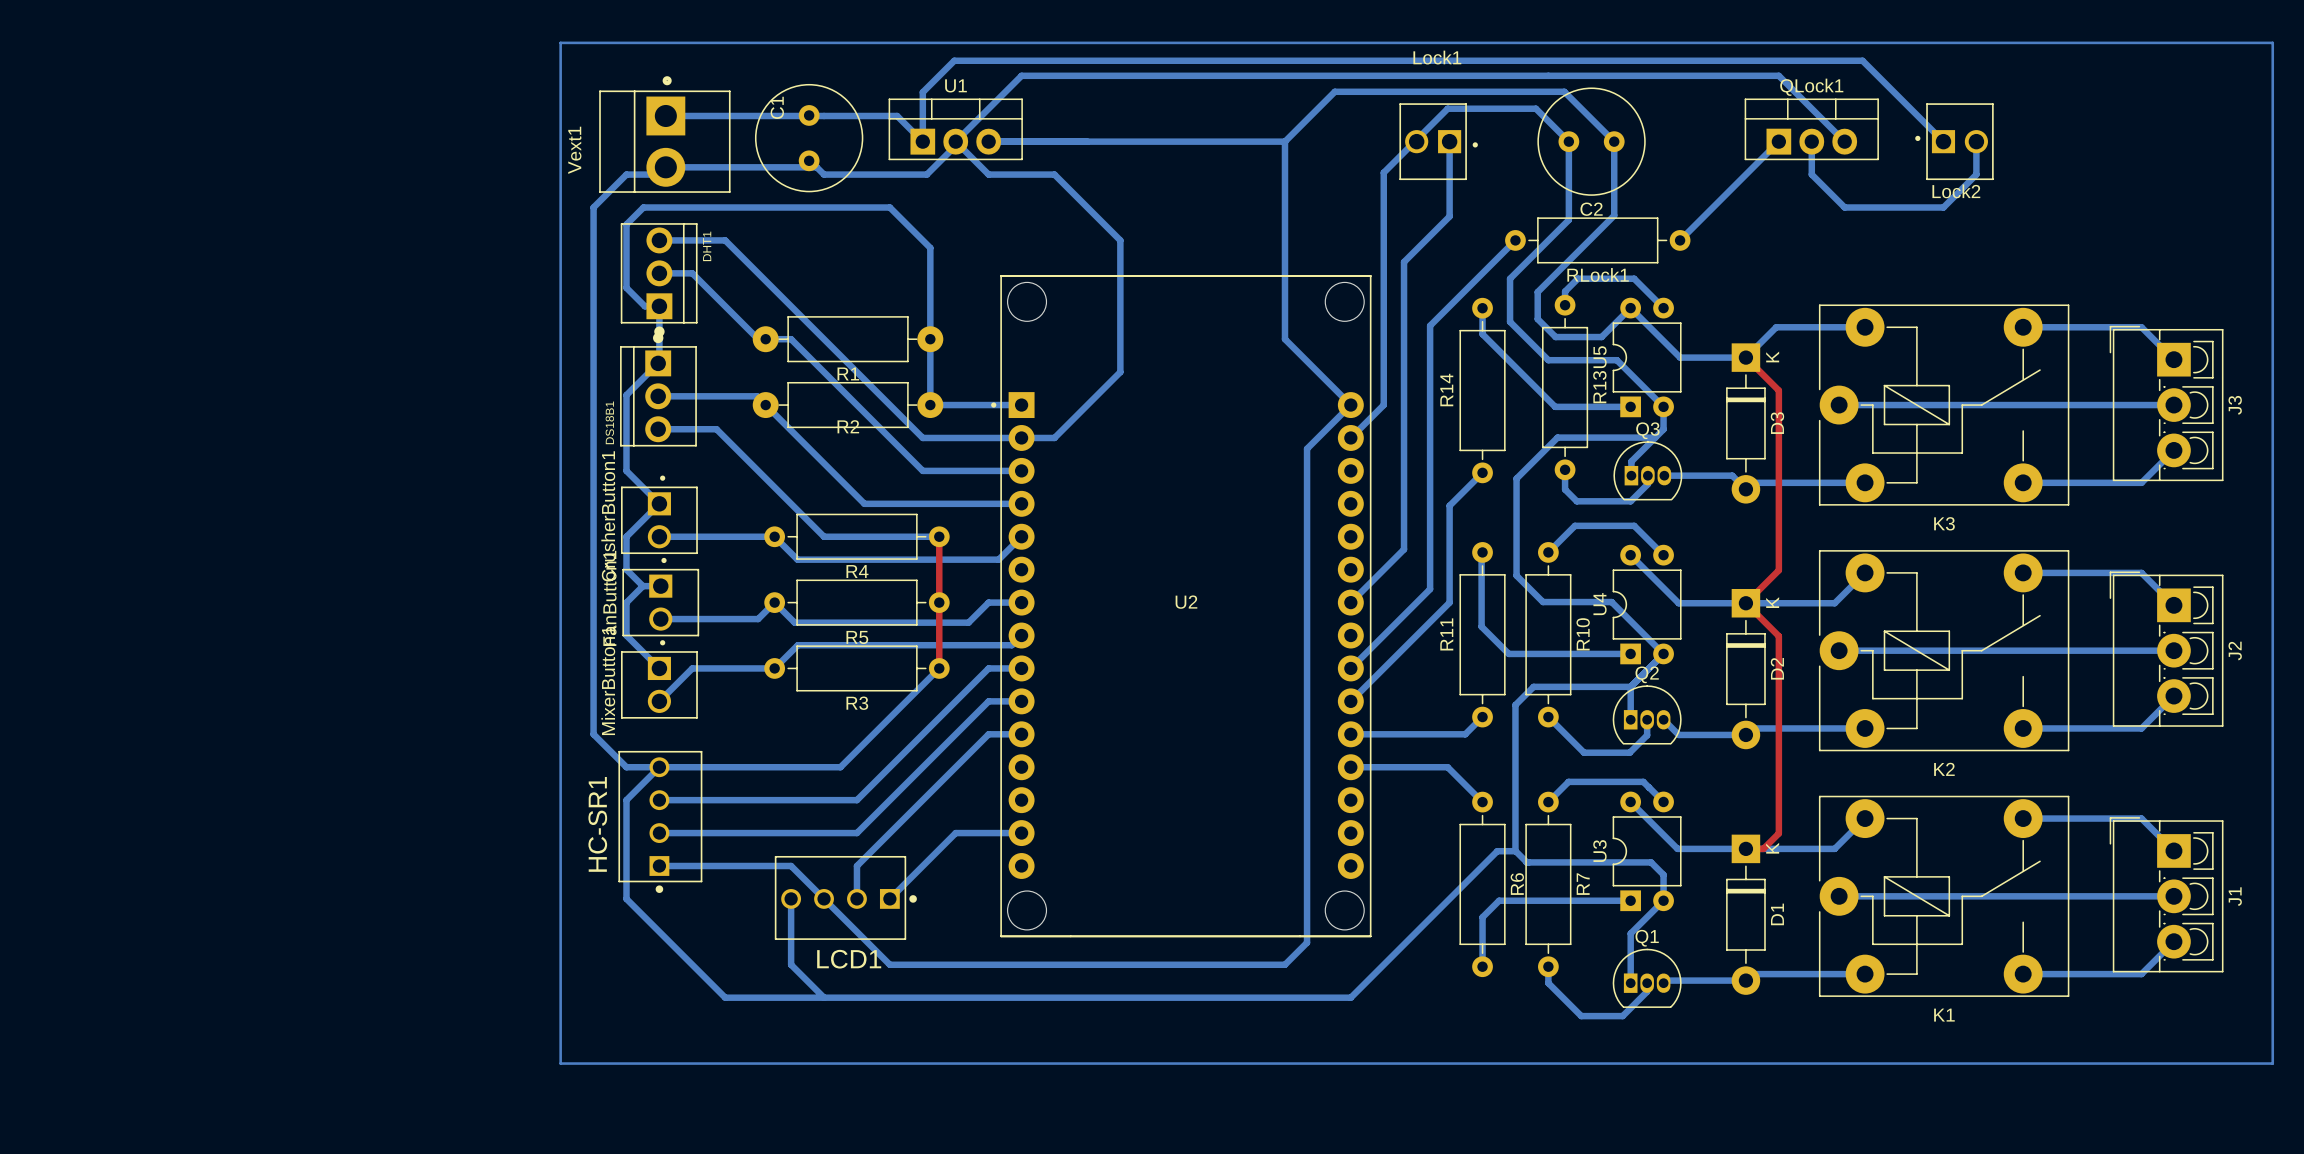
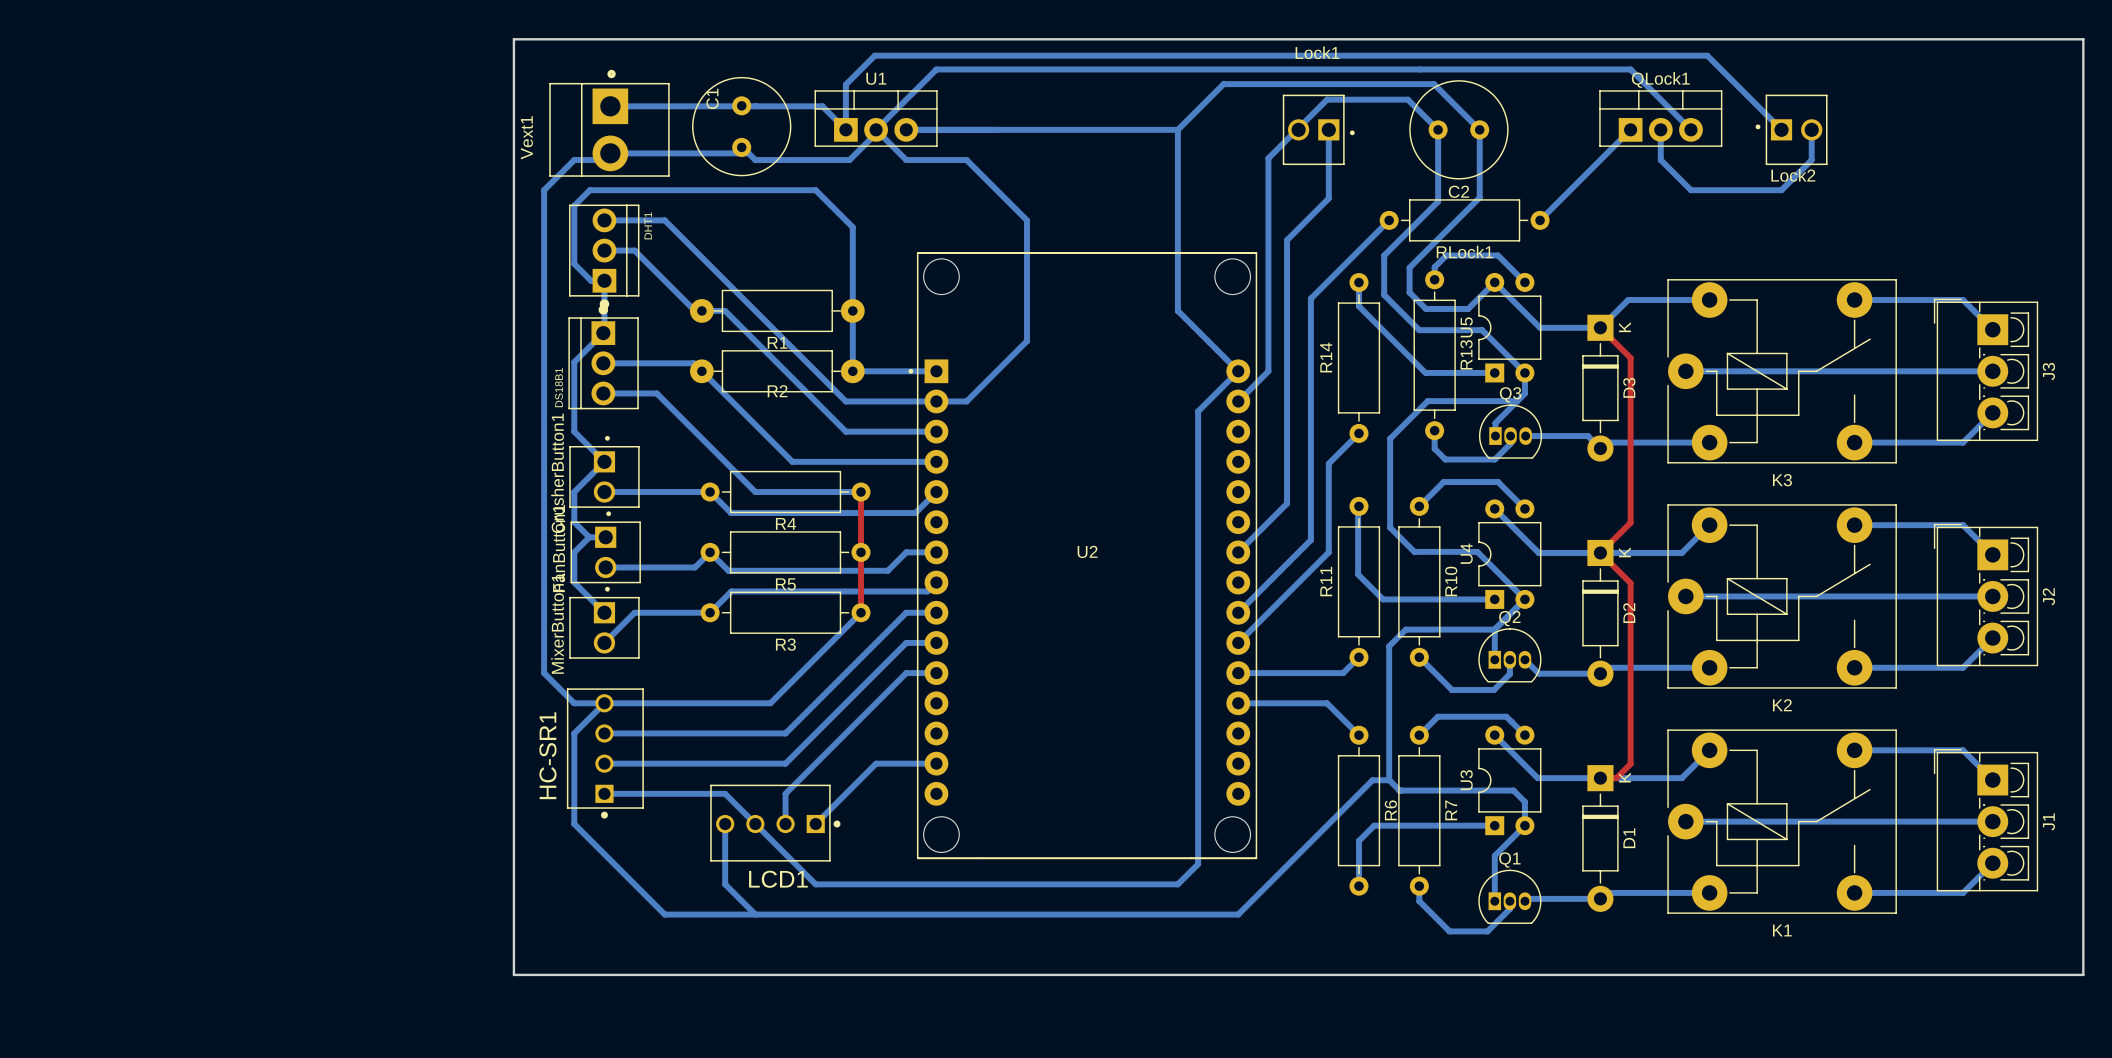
bottom track: (560, 42) (2272, 42) (2272, 1063) (560, 1063) (560, 42) -> none
board edge: none -> (513, 39) (2083, 39) (2083, 974) (513, 974) (513, 39)
U1 footprint: [888, 98, 1023, 161] -> [814, 90, 938, 147]
QLock1 footprint: [1744, 98, 1879, 161] -> [1599, 90, 1723, 147]

